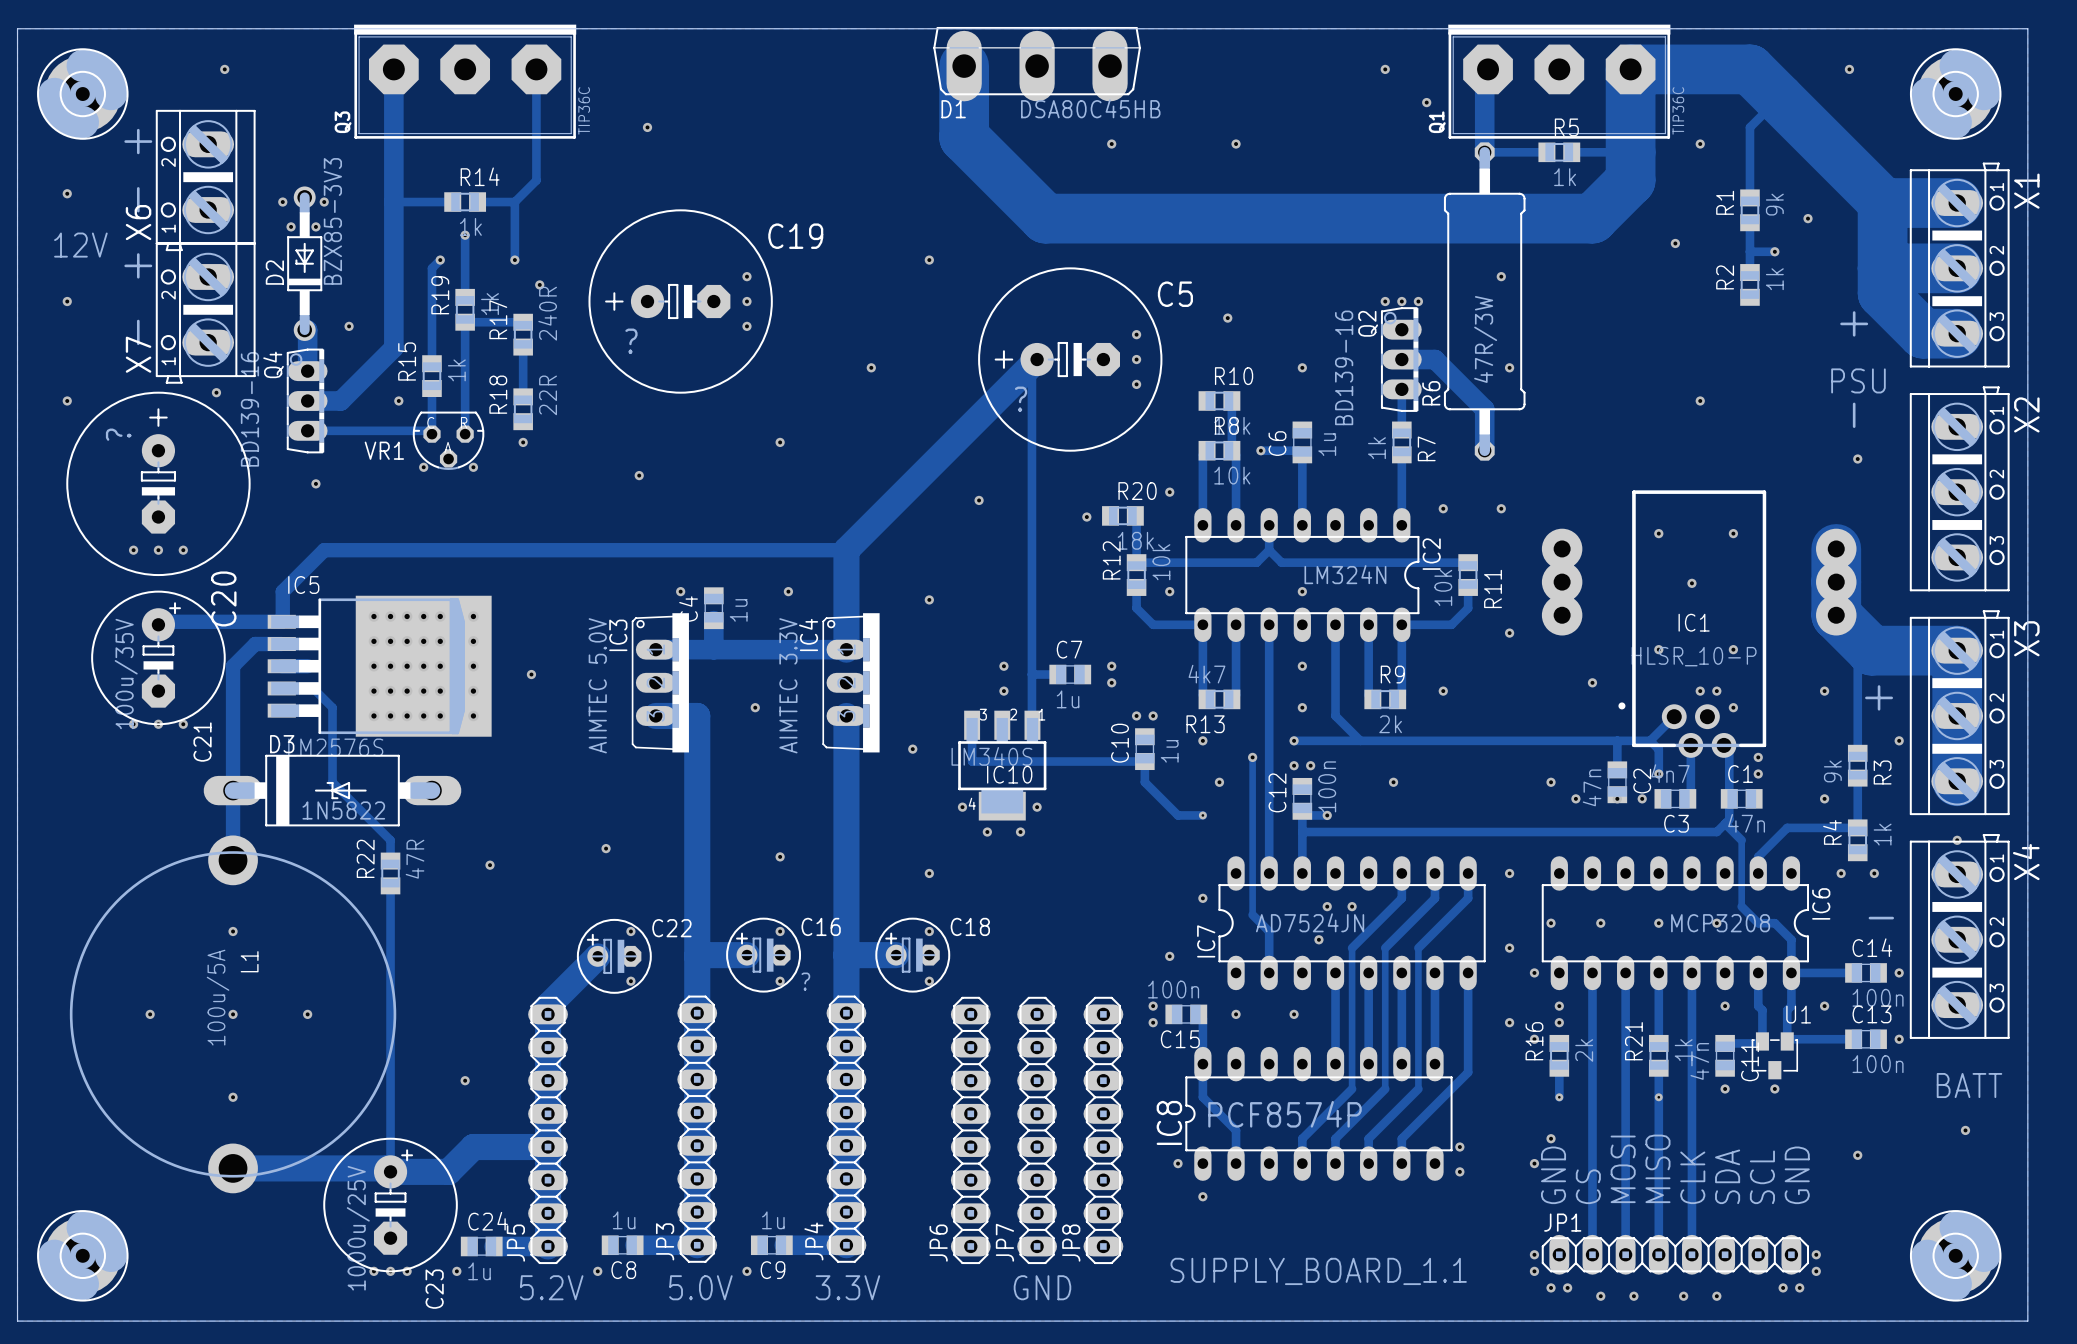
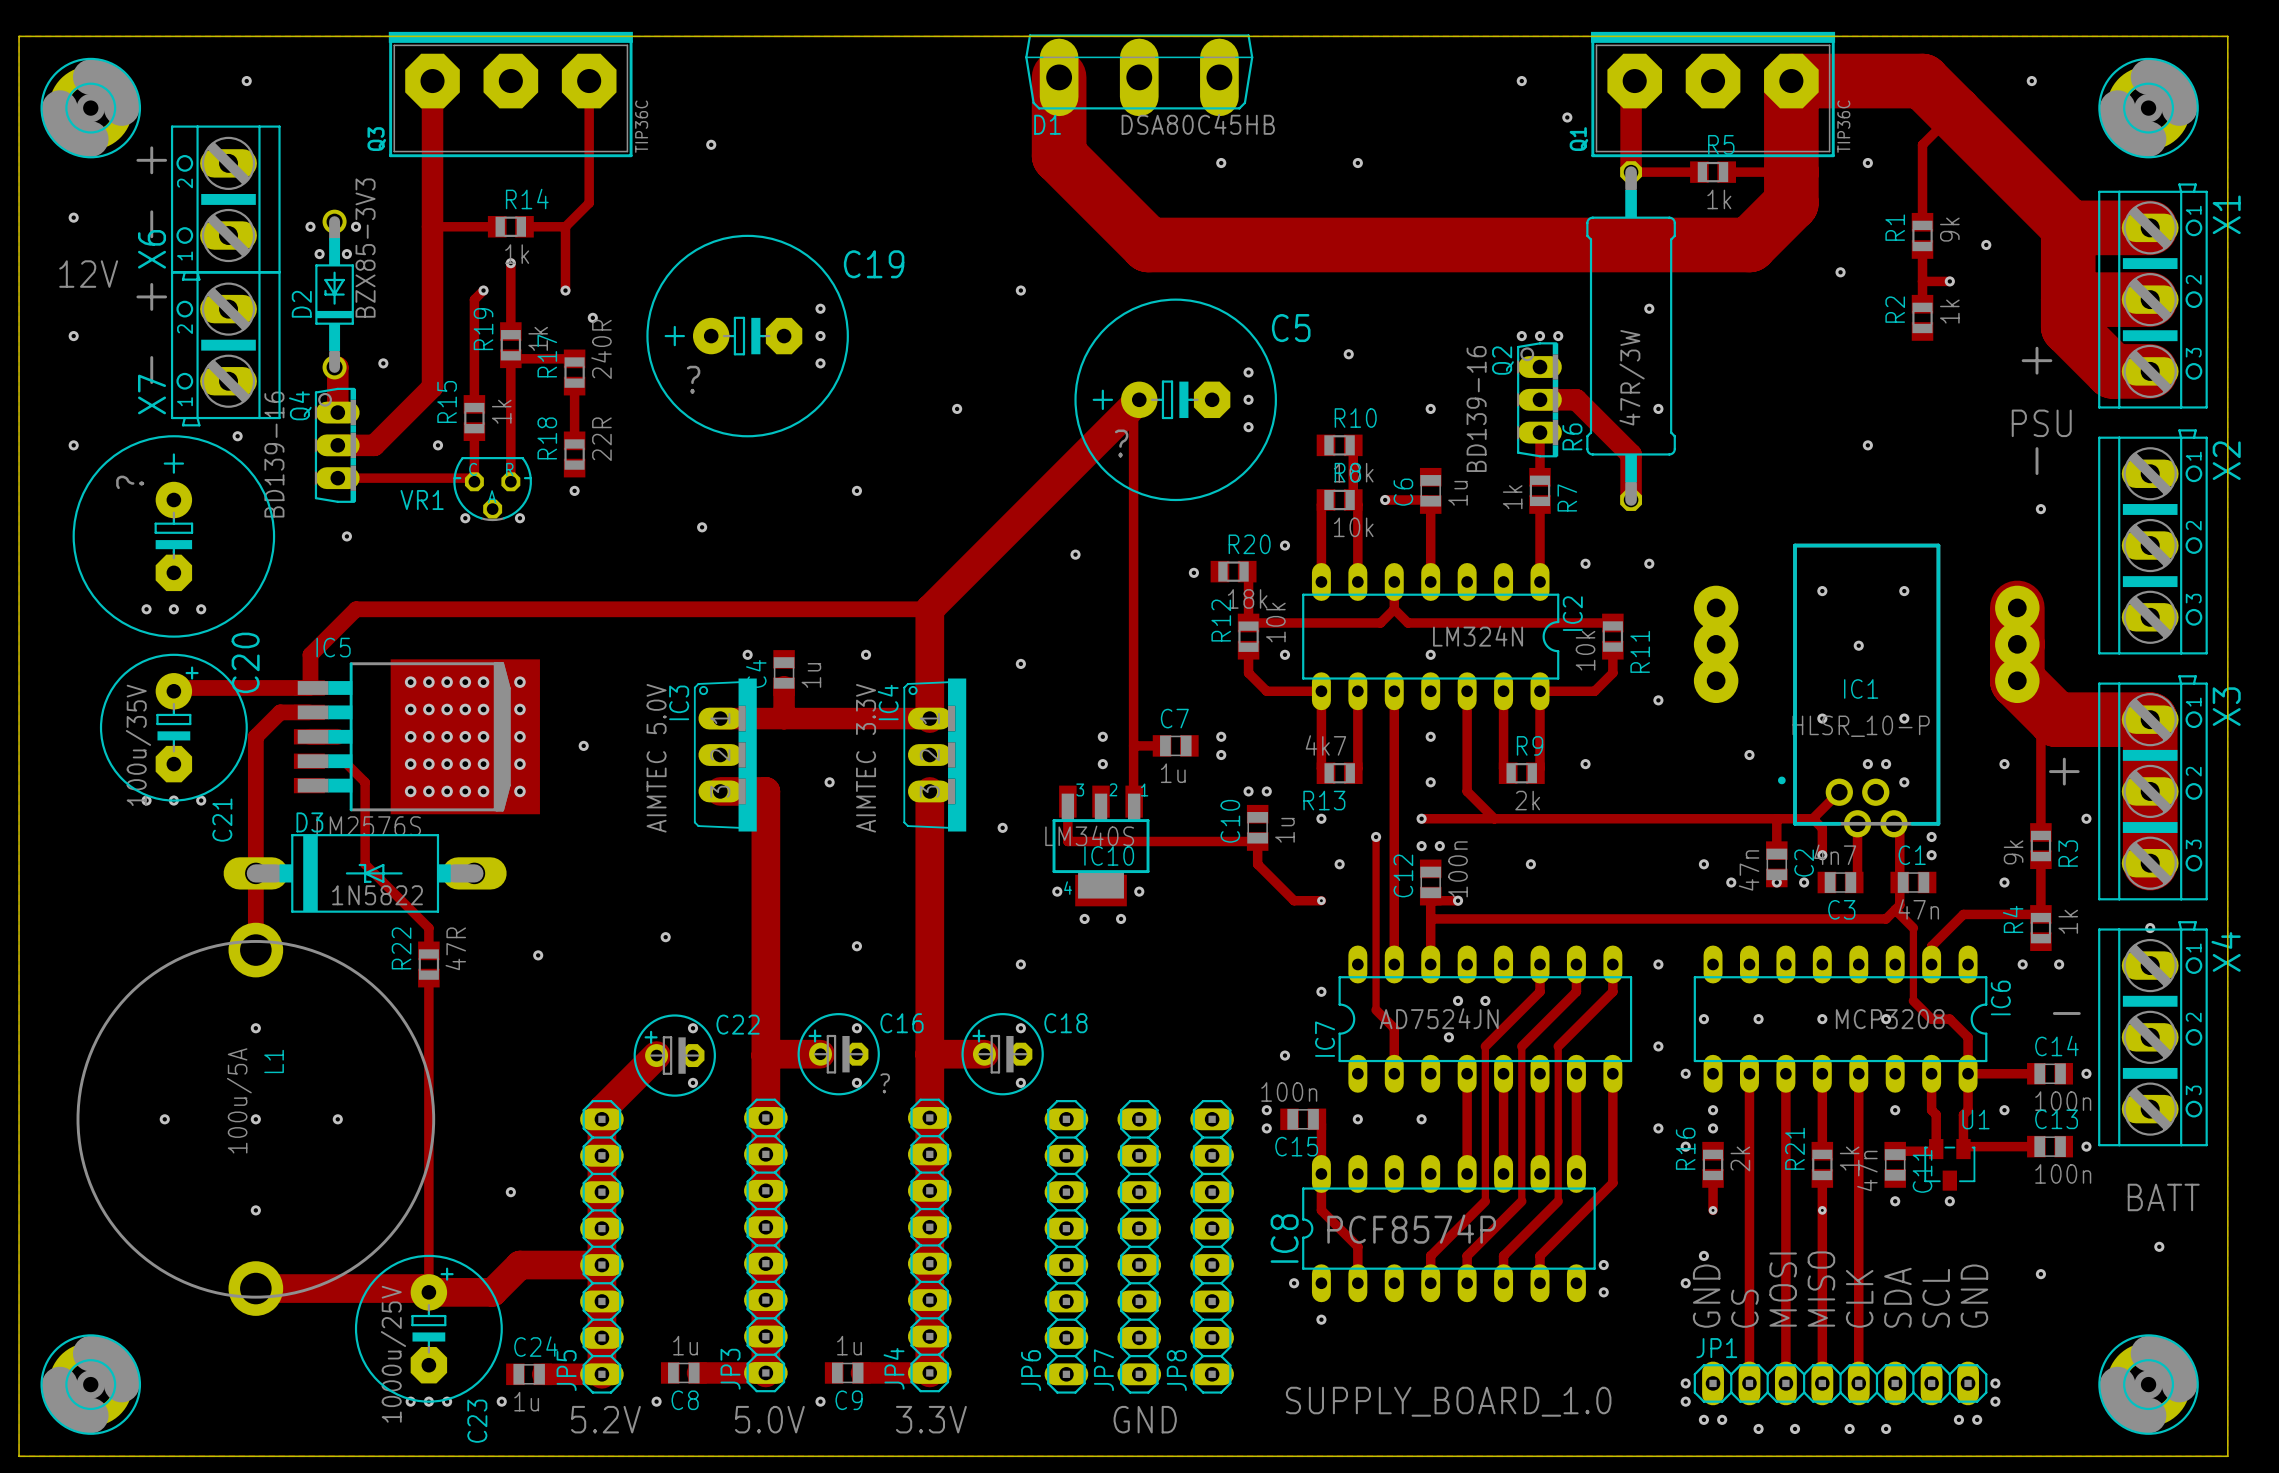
text: SUPPLY_BOARD_1.1 (1318, 1271) -> SUPPLY_BOARD_1.0 (1448, 1401)

